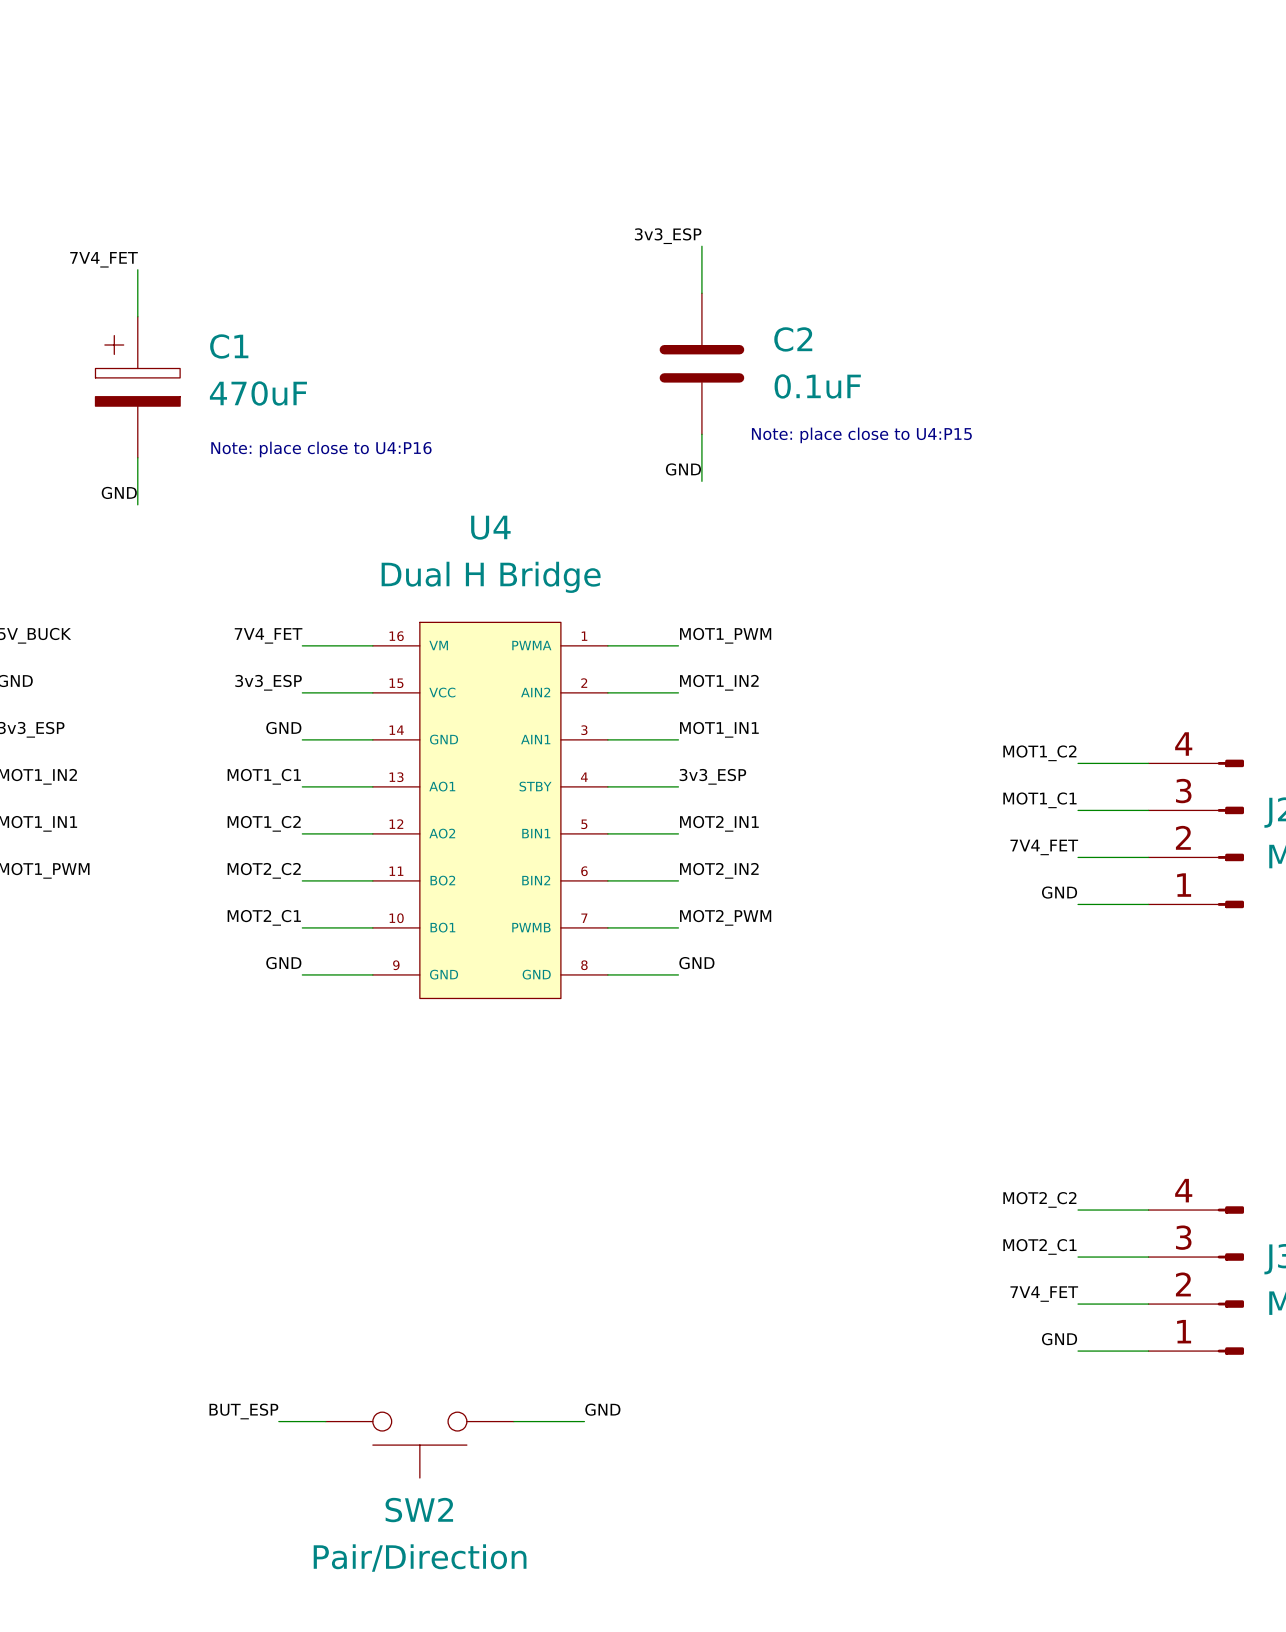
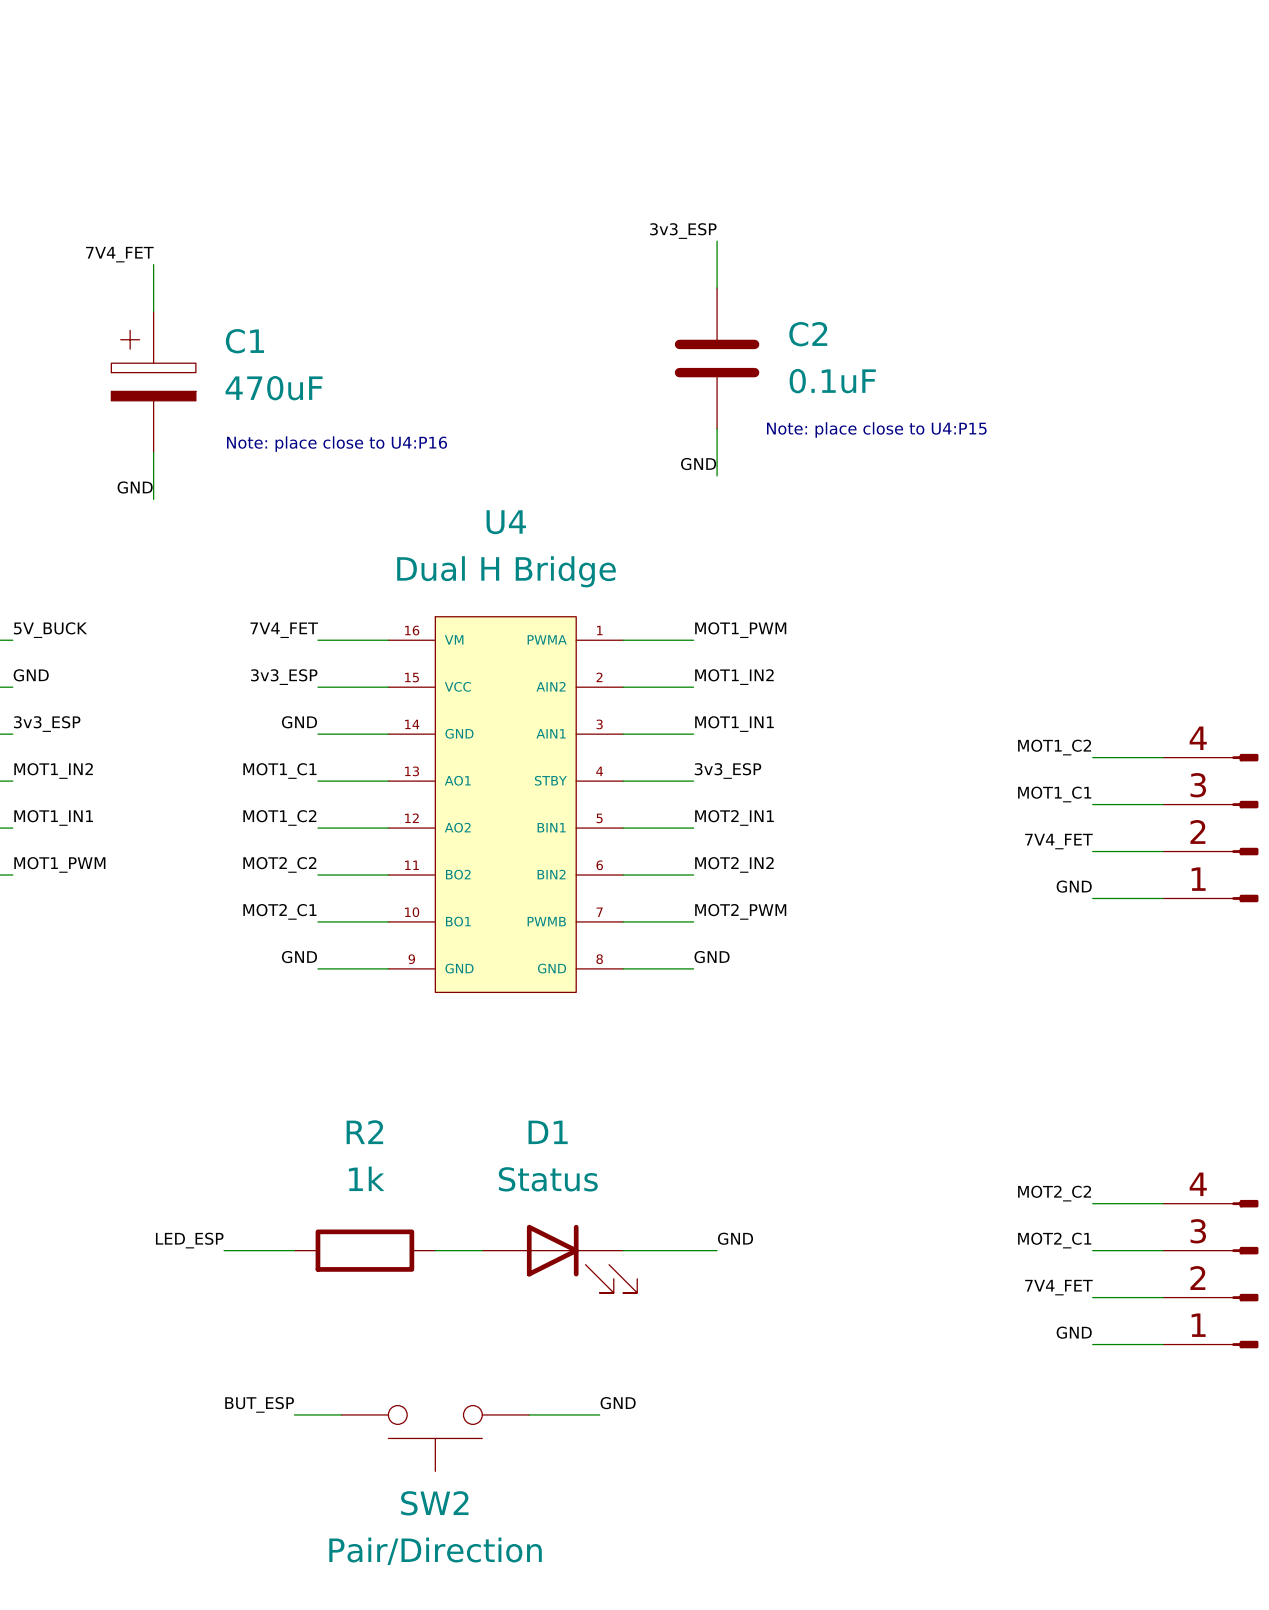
label: none -> GND (735, 1238)
label: none -> LED_ESP (189, 1240)
wire: none -> (224, 1250) (294, 1250)
R2: none -> 1k (364, 1250)
wire: none -> (435, 1250) (482, 1250)
wire: none -> (623, 1250) (717, 1250)
D1: none -> Status (559, 1258)

